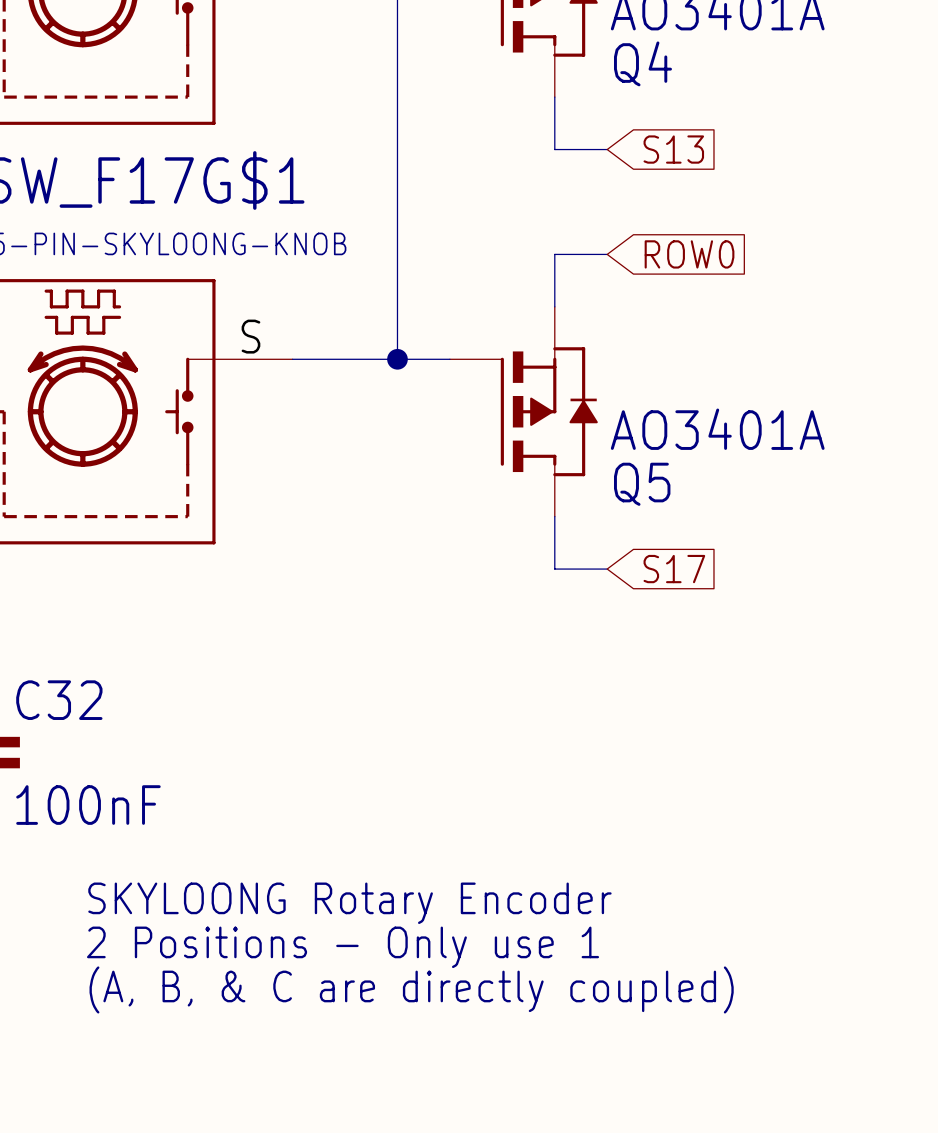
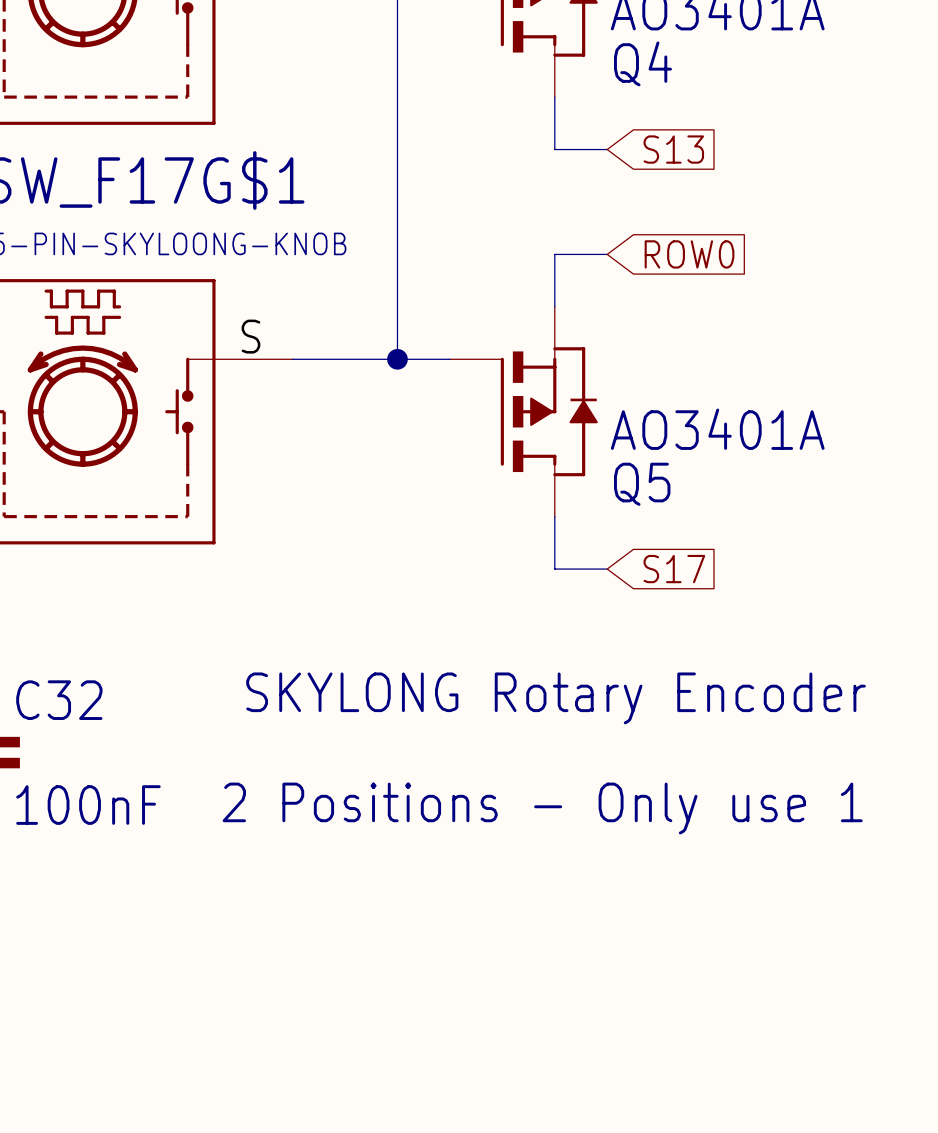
text: none -> SKYLONG Rotary Encoder (556, 698)
text: none -> 2 Positions - Only use 1 (542, 808)
text: SKYLOONG Rotary Encoder (349, 903) -> none
text: 2 Positions - Only use 1 (343, 947) -> none
text: (A, B, & C are directly coupled) (411, 989) -> none

